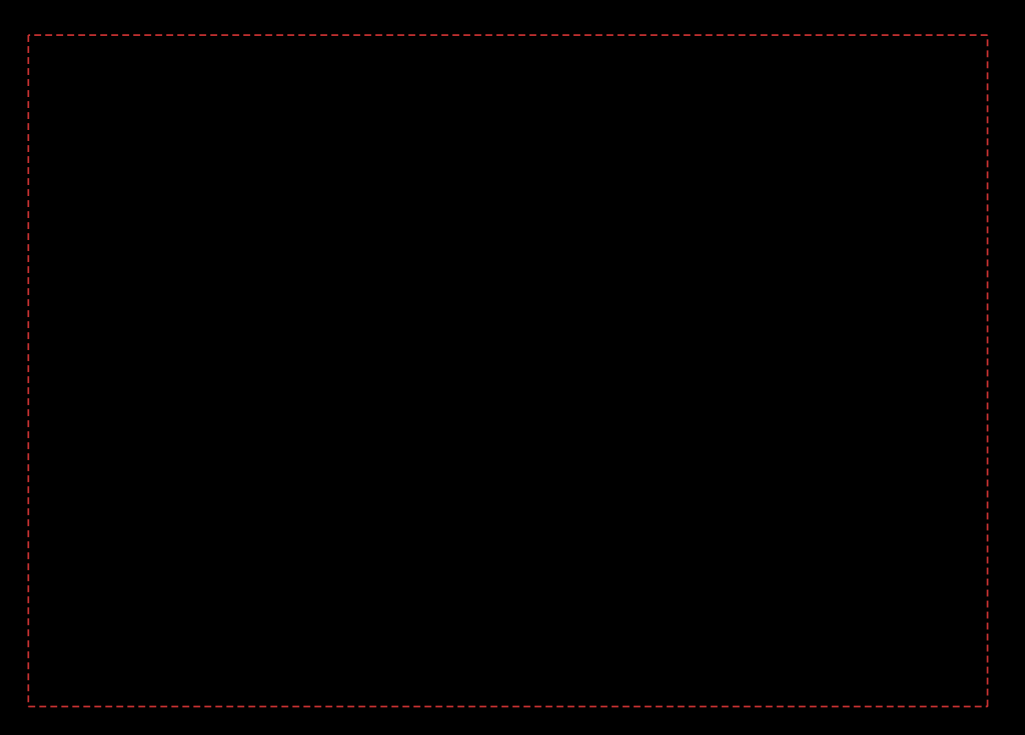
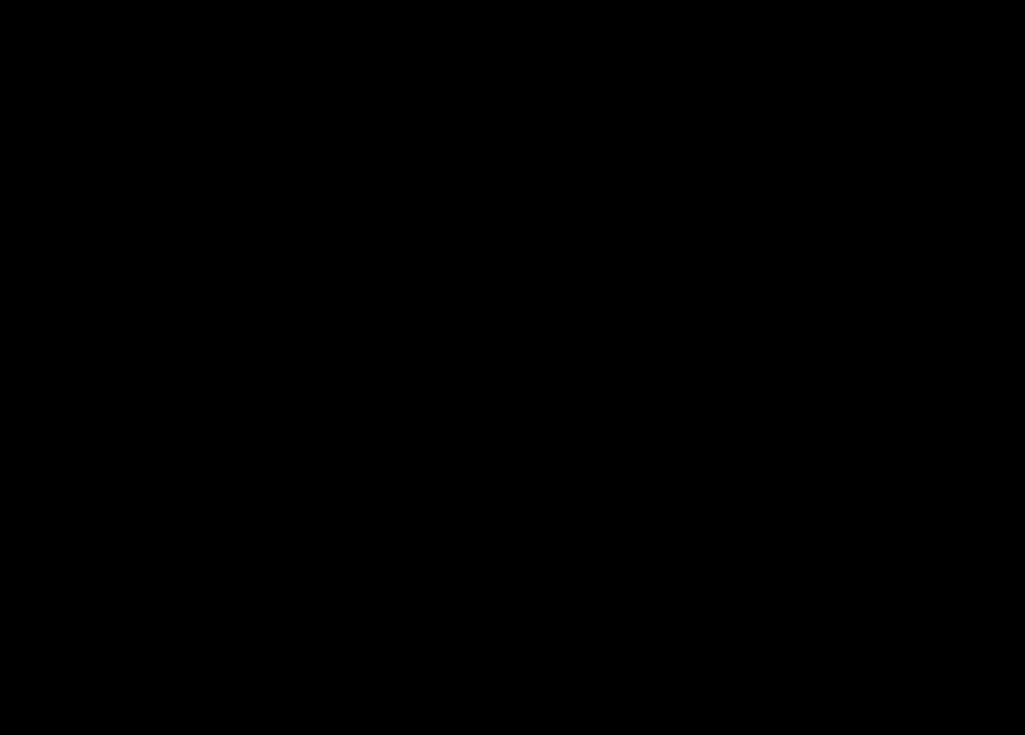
top zone outline: (28, 35) (28, 706) (987, 706) (987, 35) (28, 35) -> none

